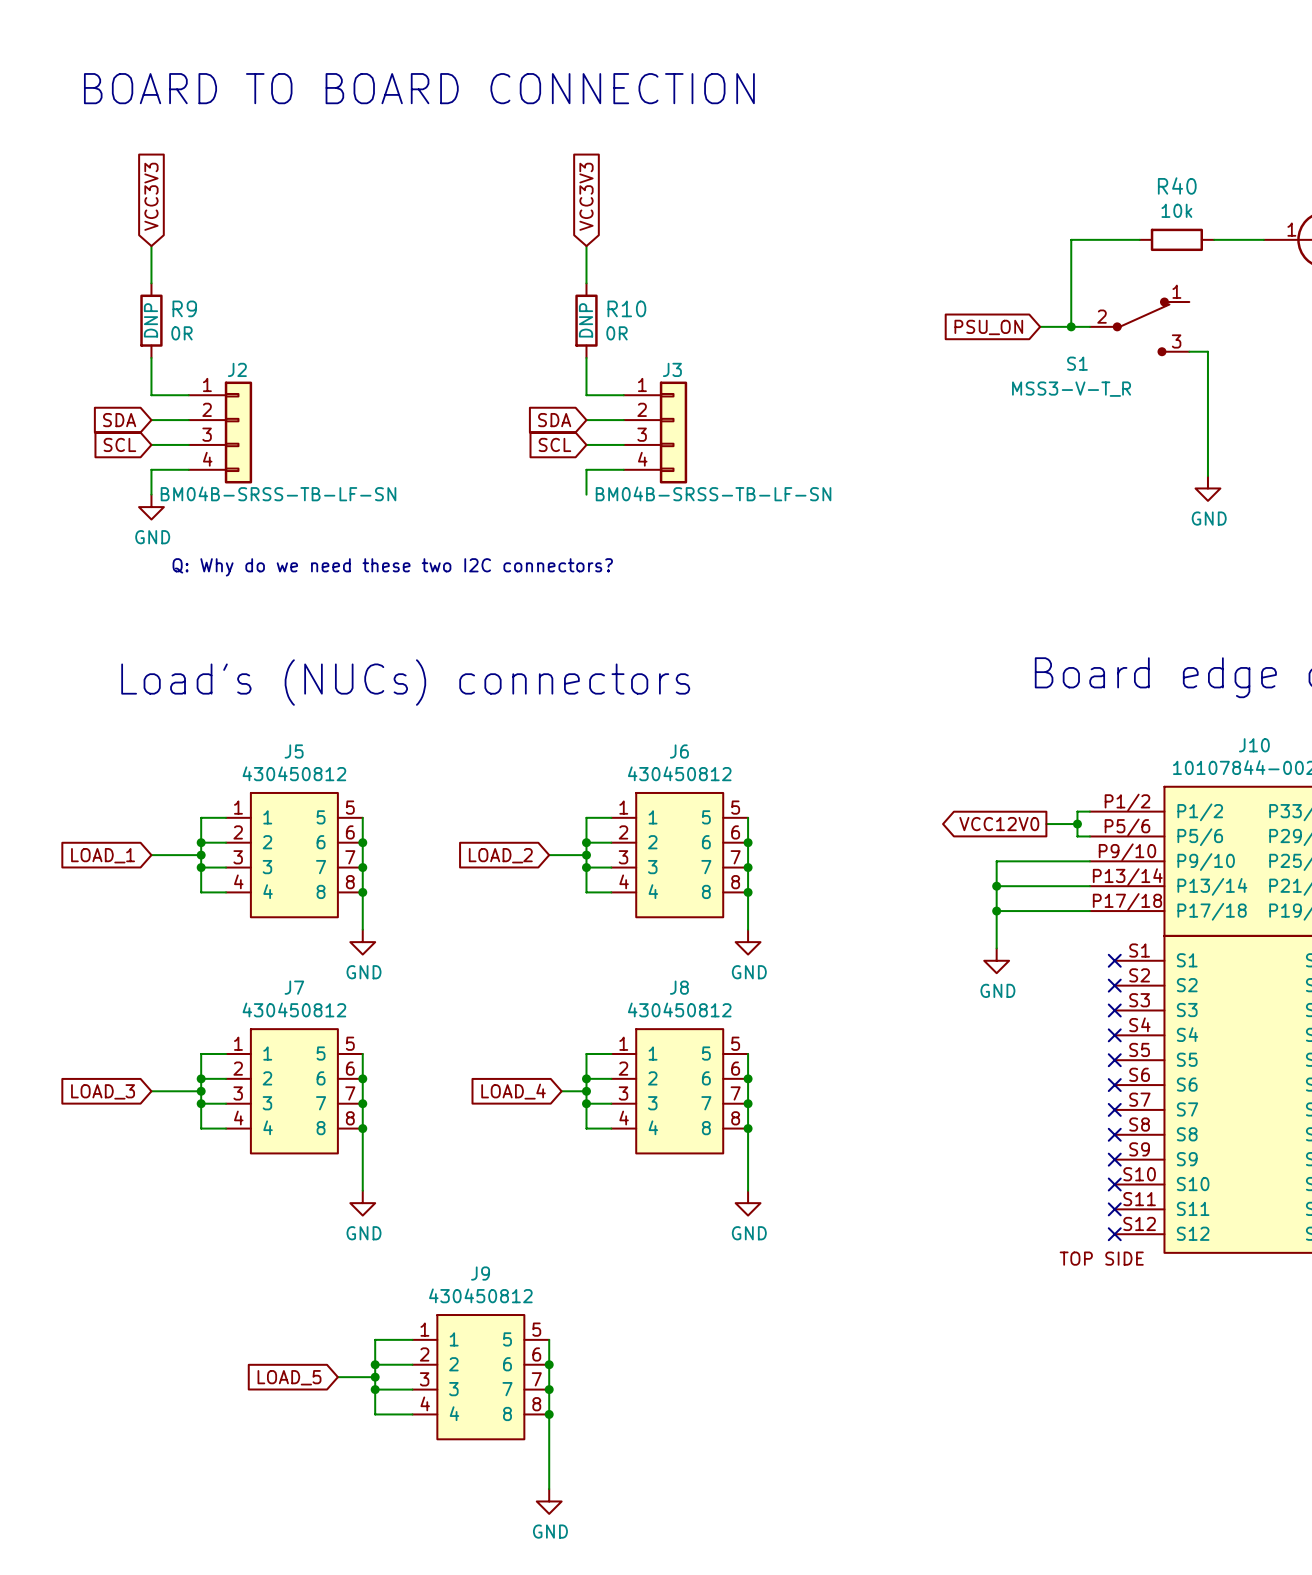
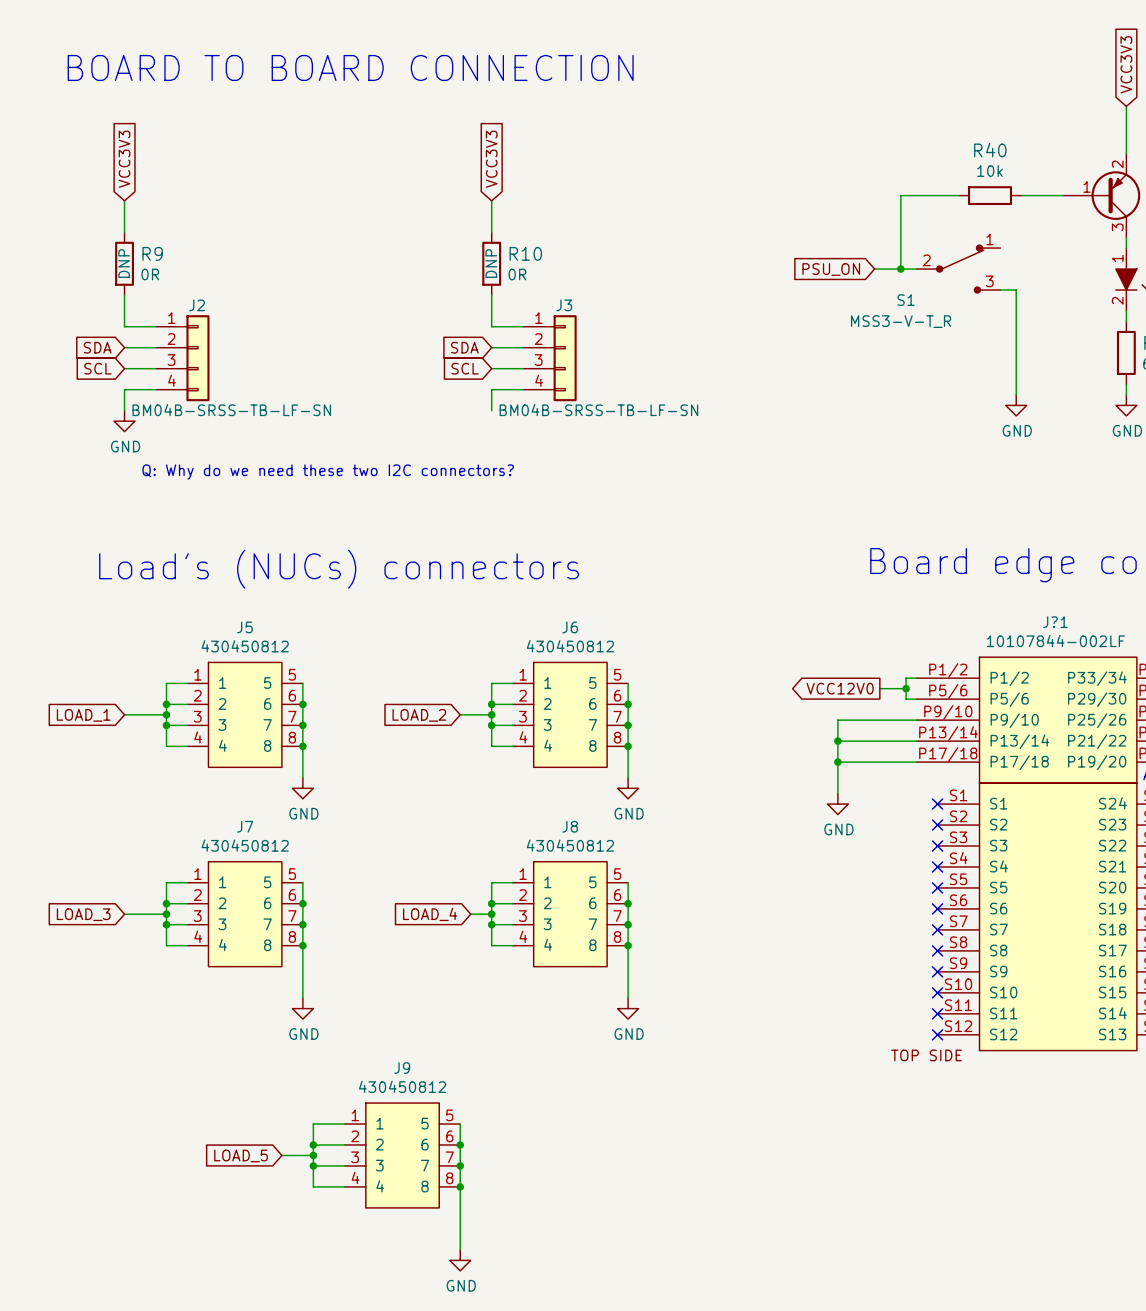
J10 name: J10 (1254, 745) -> J?1 (1055, 622)

